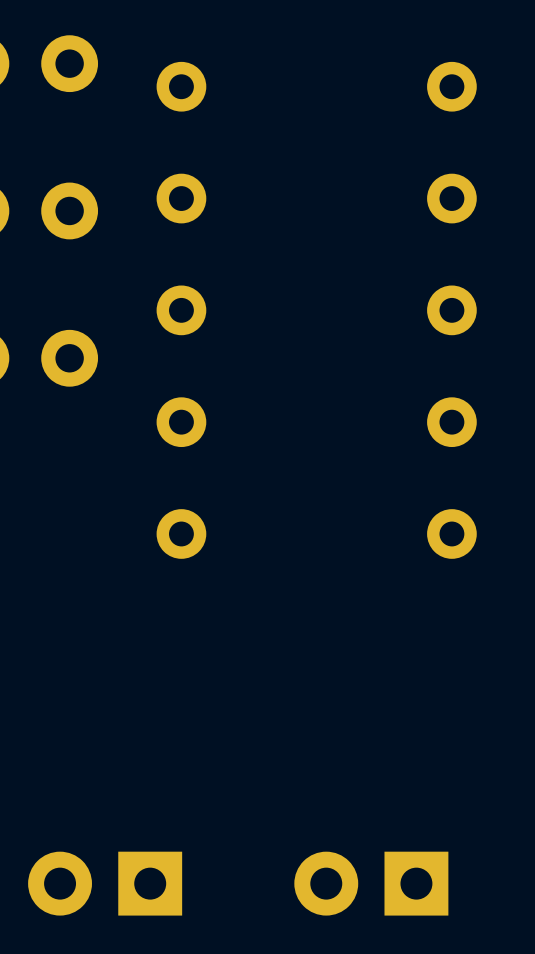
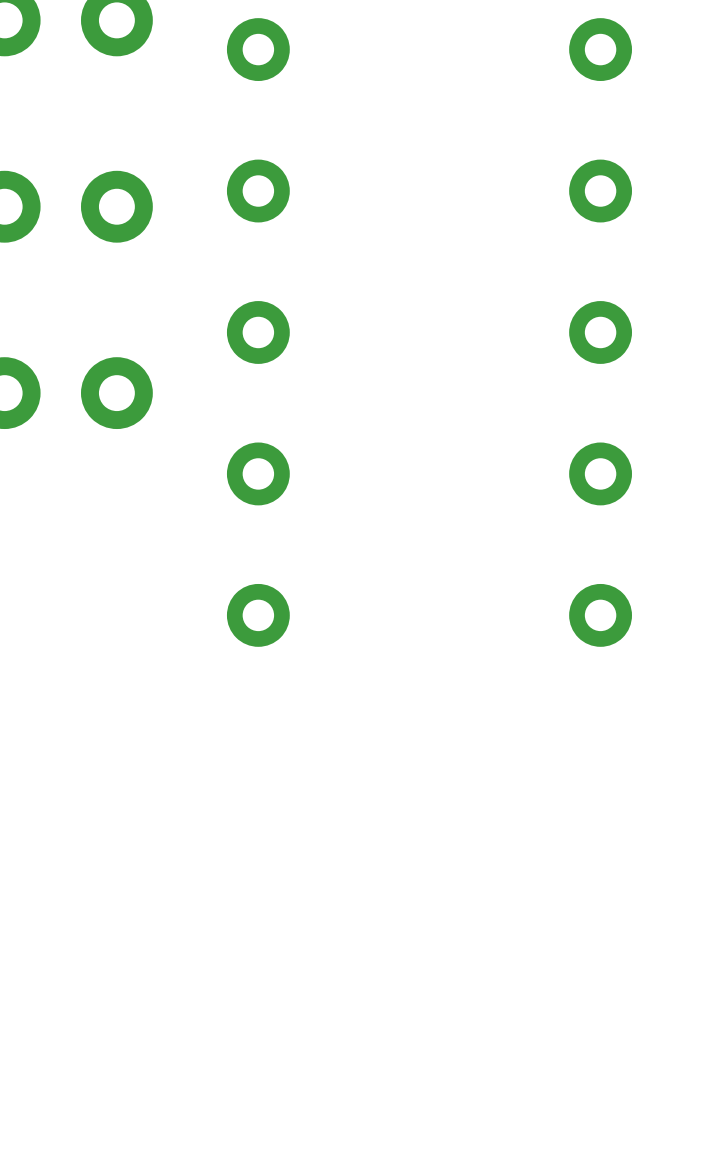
part: (105, 883) -> none
part: (371, 883) -> none

